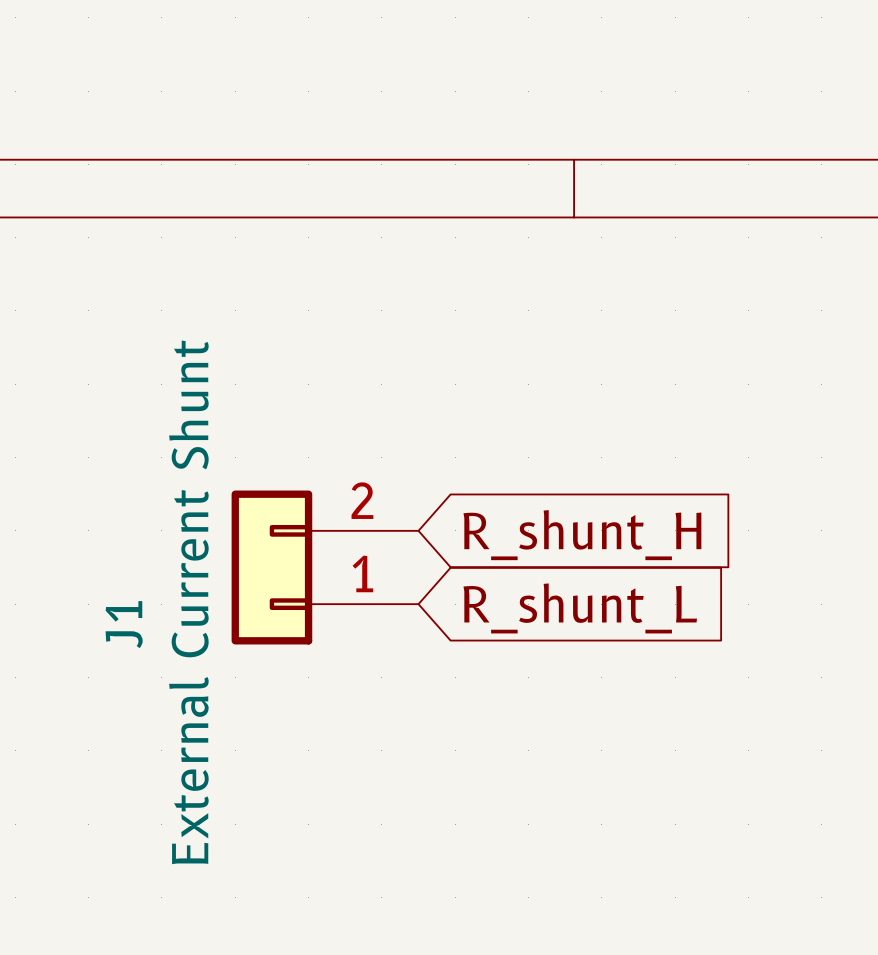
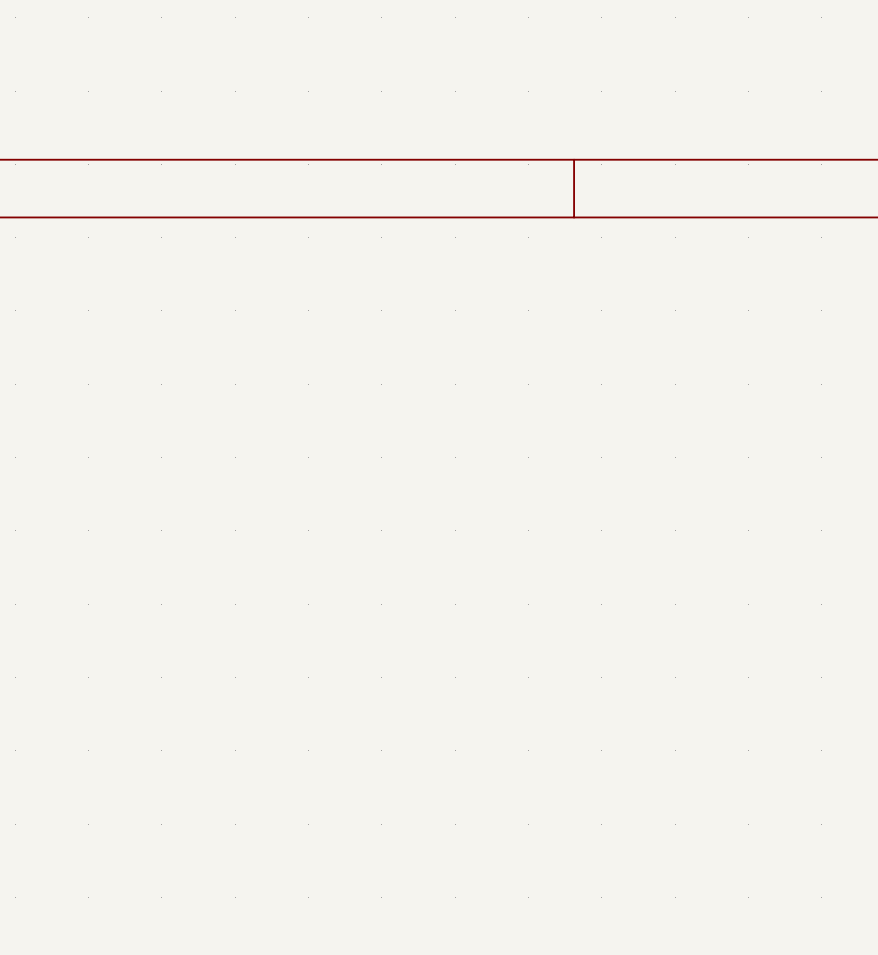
global label: R_shunt_H (582, 535) -> none
J1: External Current Shunt (325, 567) -> none
global label: R_shunt_L (580, 608) -> none

